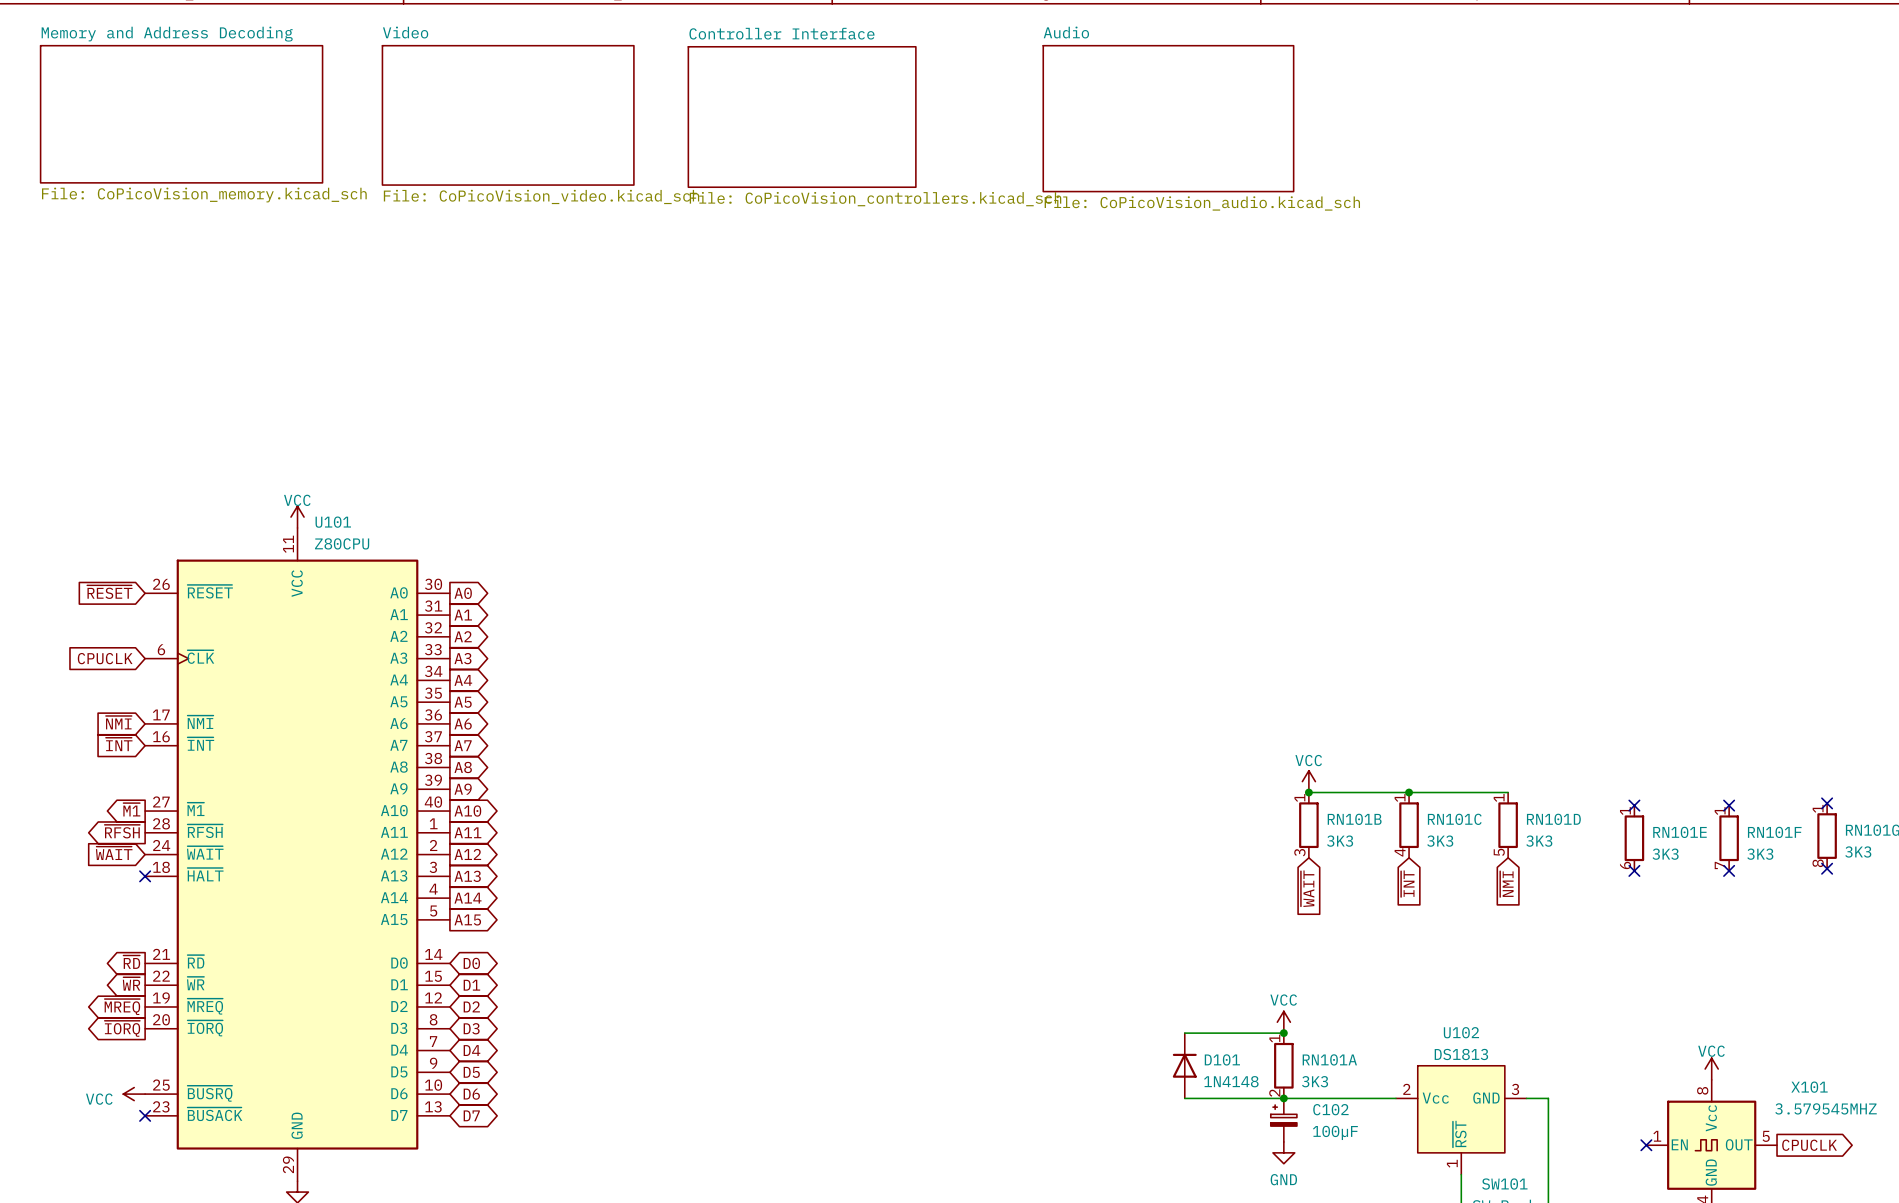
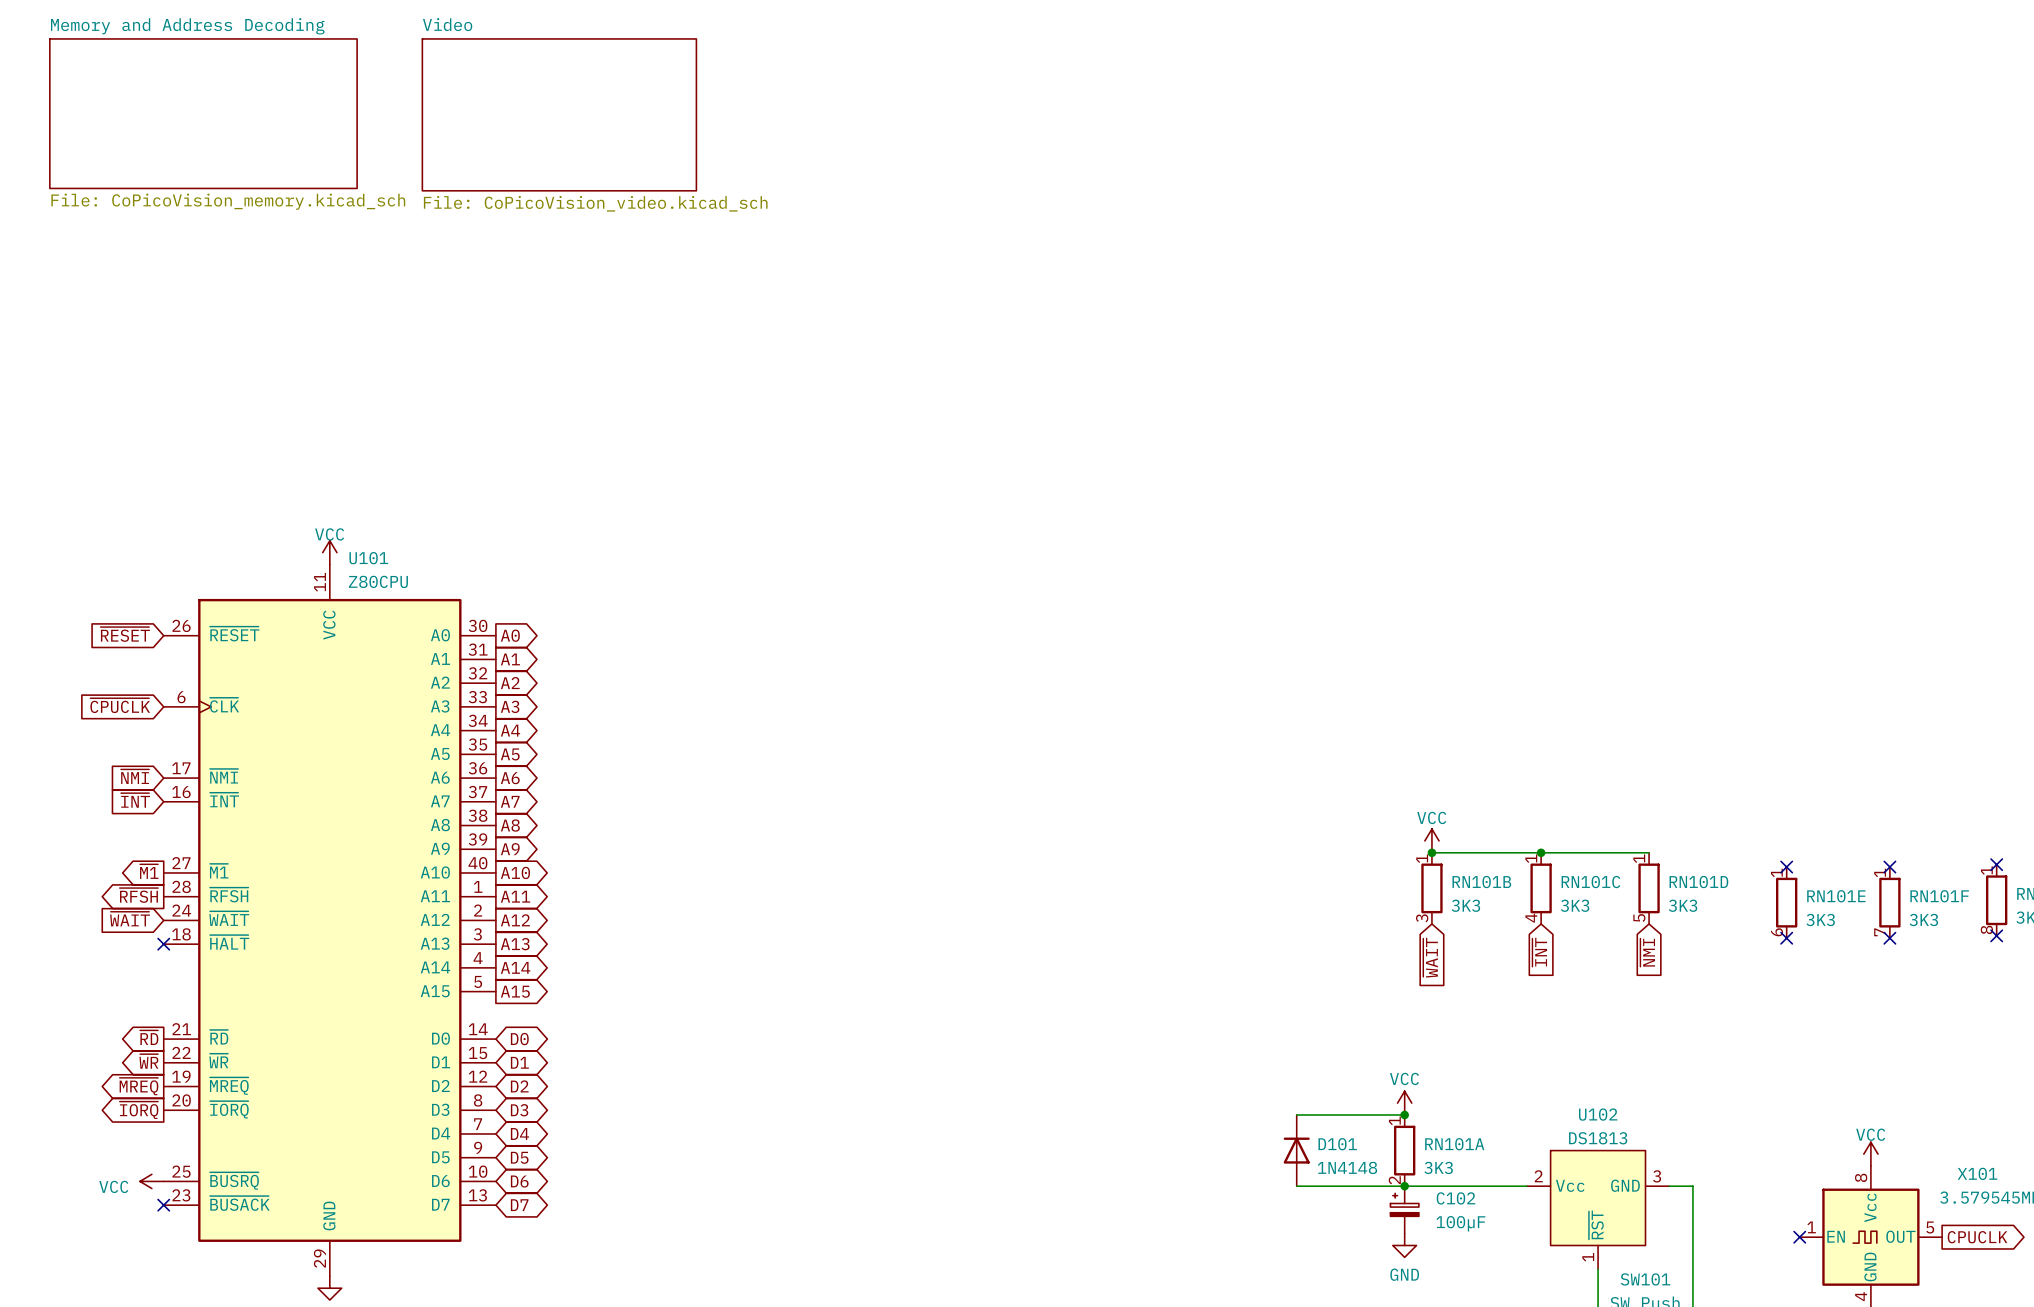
sheet Controller Interface: File: CoPicoVision_controllers.kicad_sch (802, 117) -> none
sheet Audio: File: CoPicoVision_audio.kicad_sch (1168, 118) -> none
global label: CPUCLK (105, 658) -> ~{CPUCLK} (120, 705)

